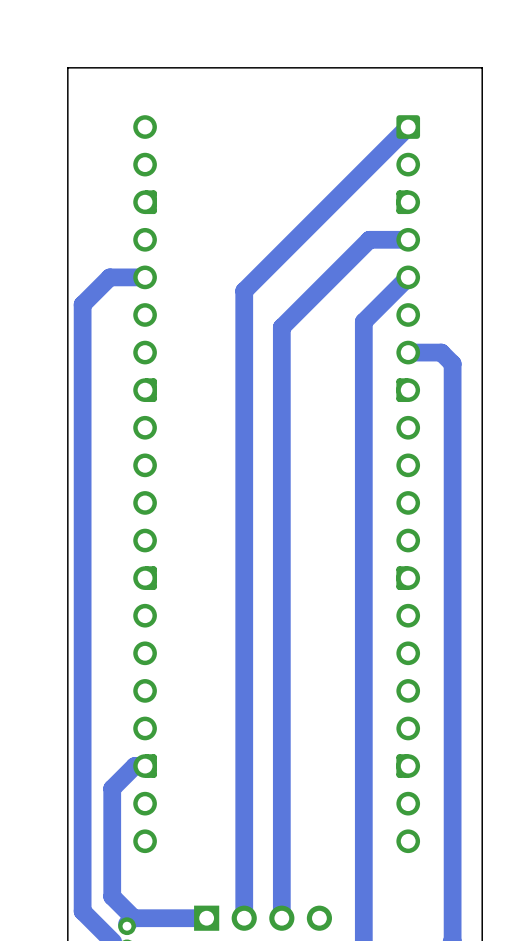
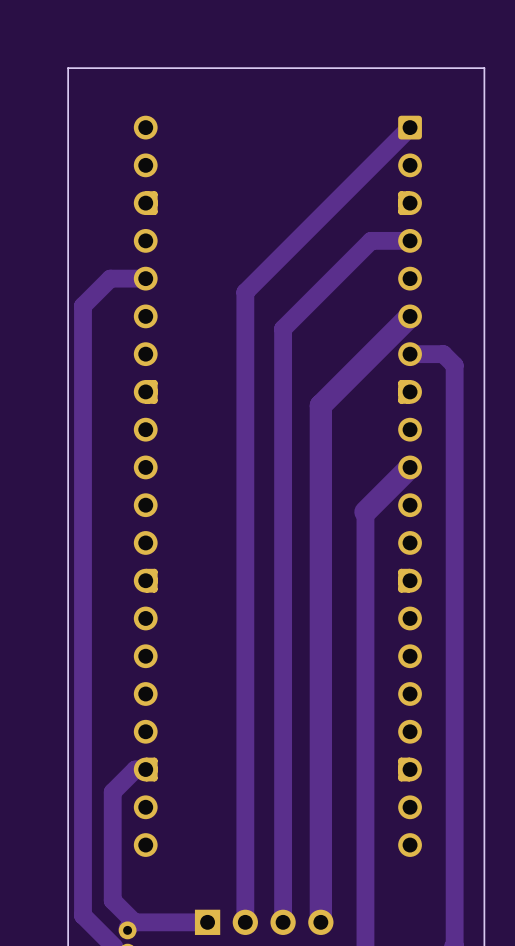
track: (408, 277) (363, 321) (363, 509) -> (410, 467) (365, 512)
track: none -> (410, 316) (320, 405) (320, 922)

